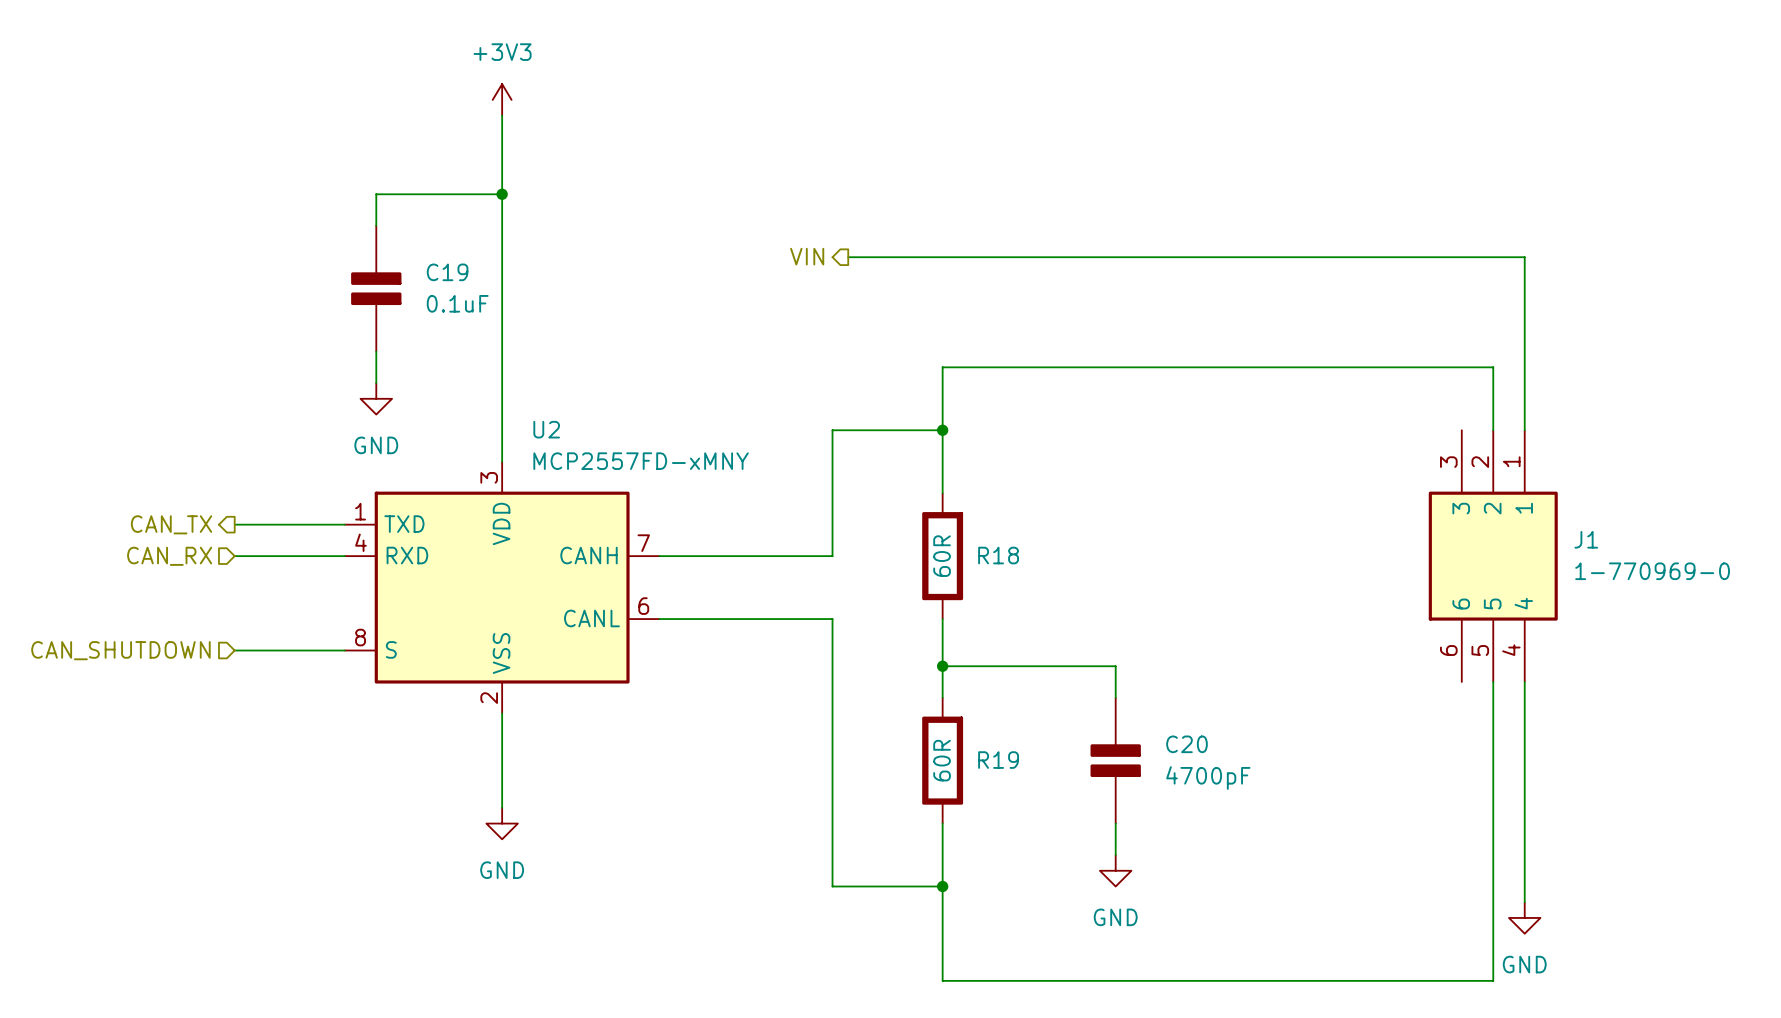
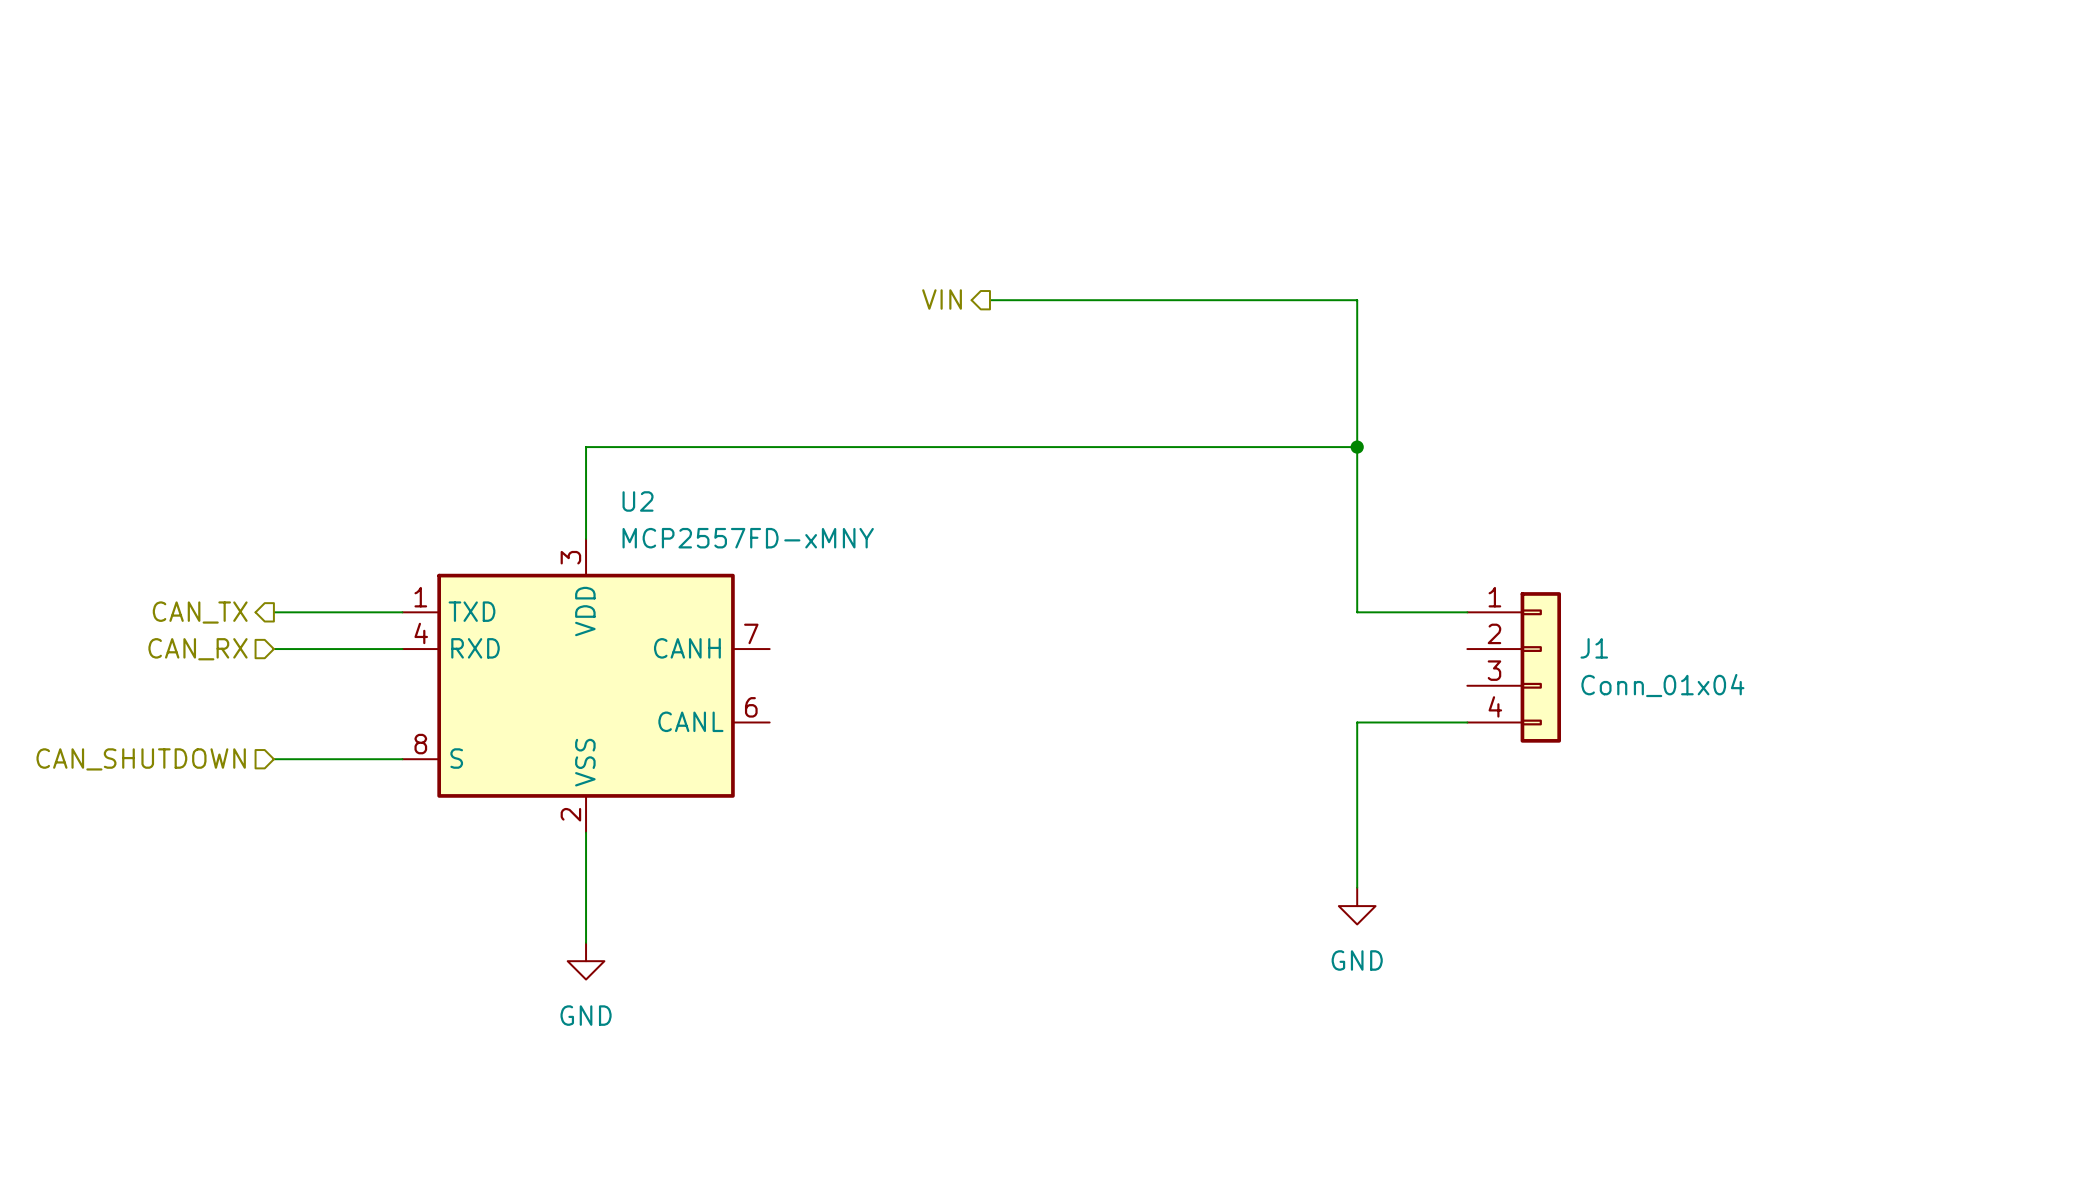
power symbol: +3V3 (502, 99) -> none
wire: (502, 115) (502, 383) -> (1357, 447) (586, 447)
wire: (502, 194) (376, 194) (376, 225) -> none
junction: (502, 194) -> none
wire: (1162, 257) (1524, 257) (1524, 430) -> (1357, 300) (1357, 612) (1467, 612)
C19: 0.1uF (376, 288) -> none
wire: (376, 351) (376, 383) -> none
junction: none -> (1357, 447)
power symbol: GND (376, 398) -> none
wire: (942, 430) (832, 430) (832, 556) (659, 556) -> none
junction: (942, 430) -> none
J1 symbol: [1428, 430, 1558, 682] -> [1467, 592, 1562, 743]
wire: (1493, 430) (1493, 367) (942, 367) (942, 493) -> none
R18: 60R (942, 556) -> none
J1 value: 1-770969-0 (1652, 571) -> Conn_01x04 (1662, 685)
wire: (659, 619) (832, 619) (832, 886) (942, 886) -> none
wire: (942, 619) (942, 697) -> none
wire: none -> (1467, 722) (1357, 722) (1357, 887)
wire: (942, 666) (1115, 666) (1115, 697) -> none
junction: (942, 666) -> none
wire: (1493, 681) (1493, 980) (942, 980) (942, 823) -> none
wire: (1524, 681) (1524, 902) -> none
R19: 60R (942, 760) -> none
C20: 4700pF (1115, 760) -> none
wire: (1115, 823) (1115, 855) -> none
power symbol position: GND (1115, 870) -> GND (1357, 906)
junction: (942, 886) -> none
power symbol: GND (1524, 917) -> none

